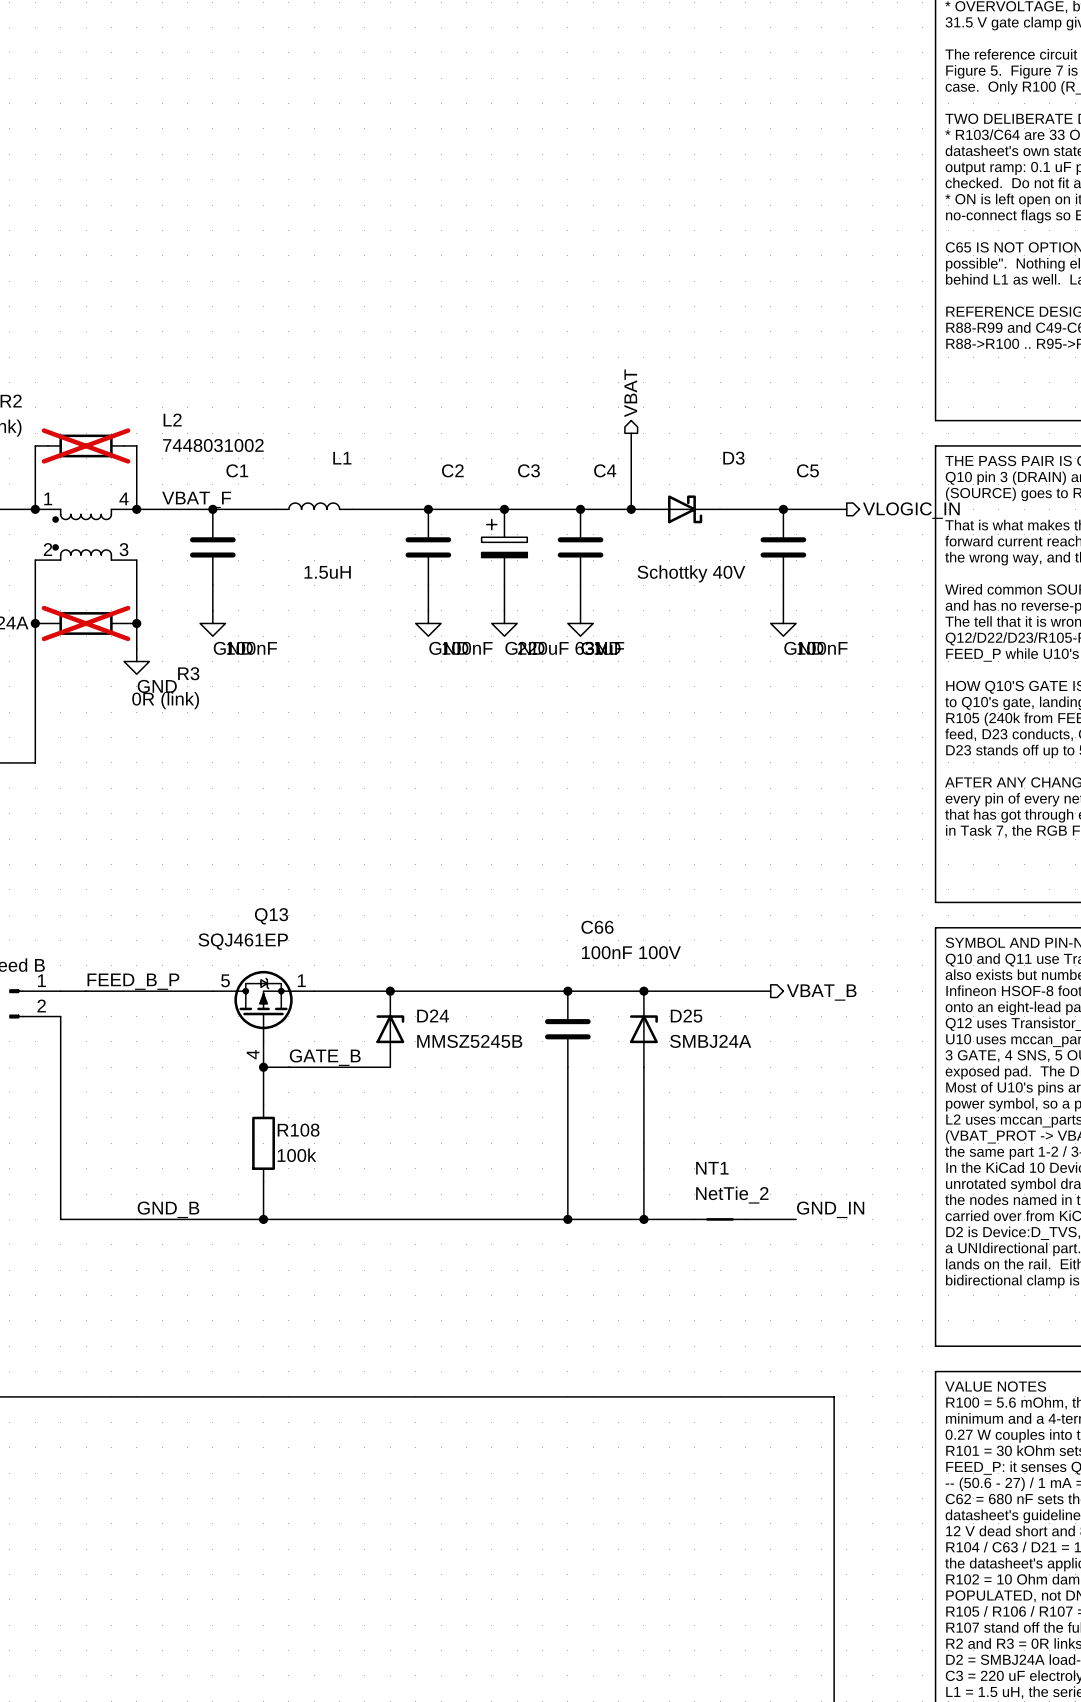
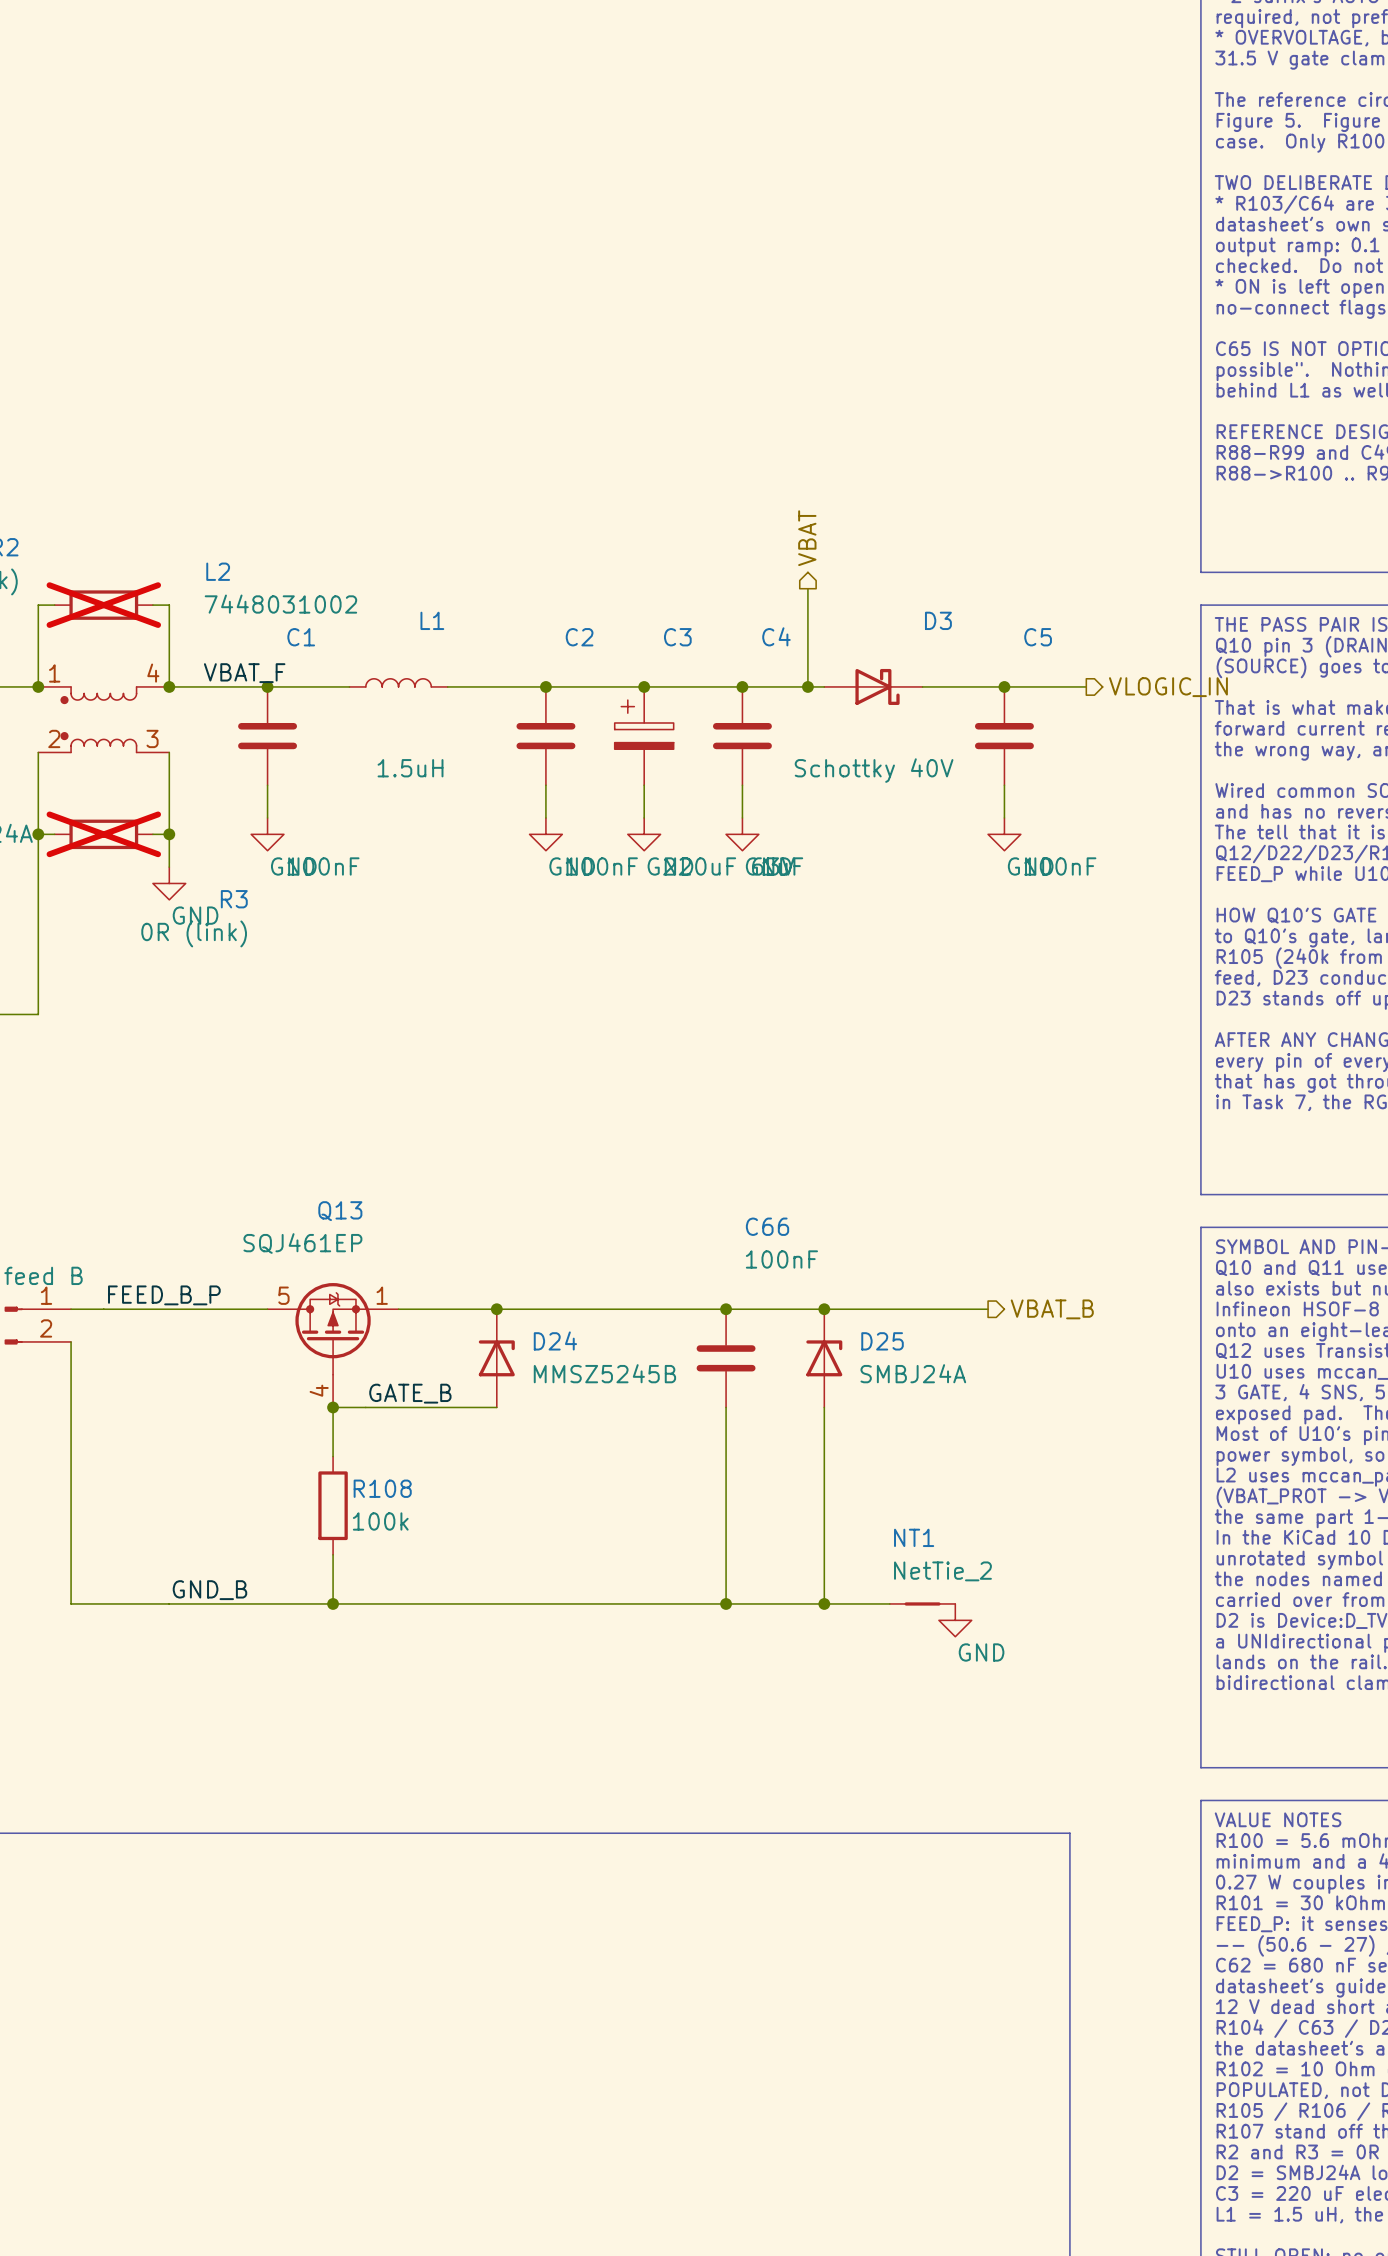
C66 value: 100nF 100V (631, 952) -> 100nF (781, 1259)
label: GND_IN (830, 1209) -> none
wire: (745, 1219) (796, 1219) -> none
power symbol: none -> GND (955, 1620)

